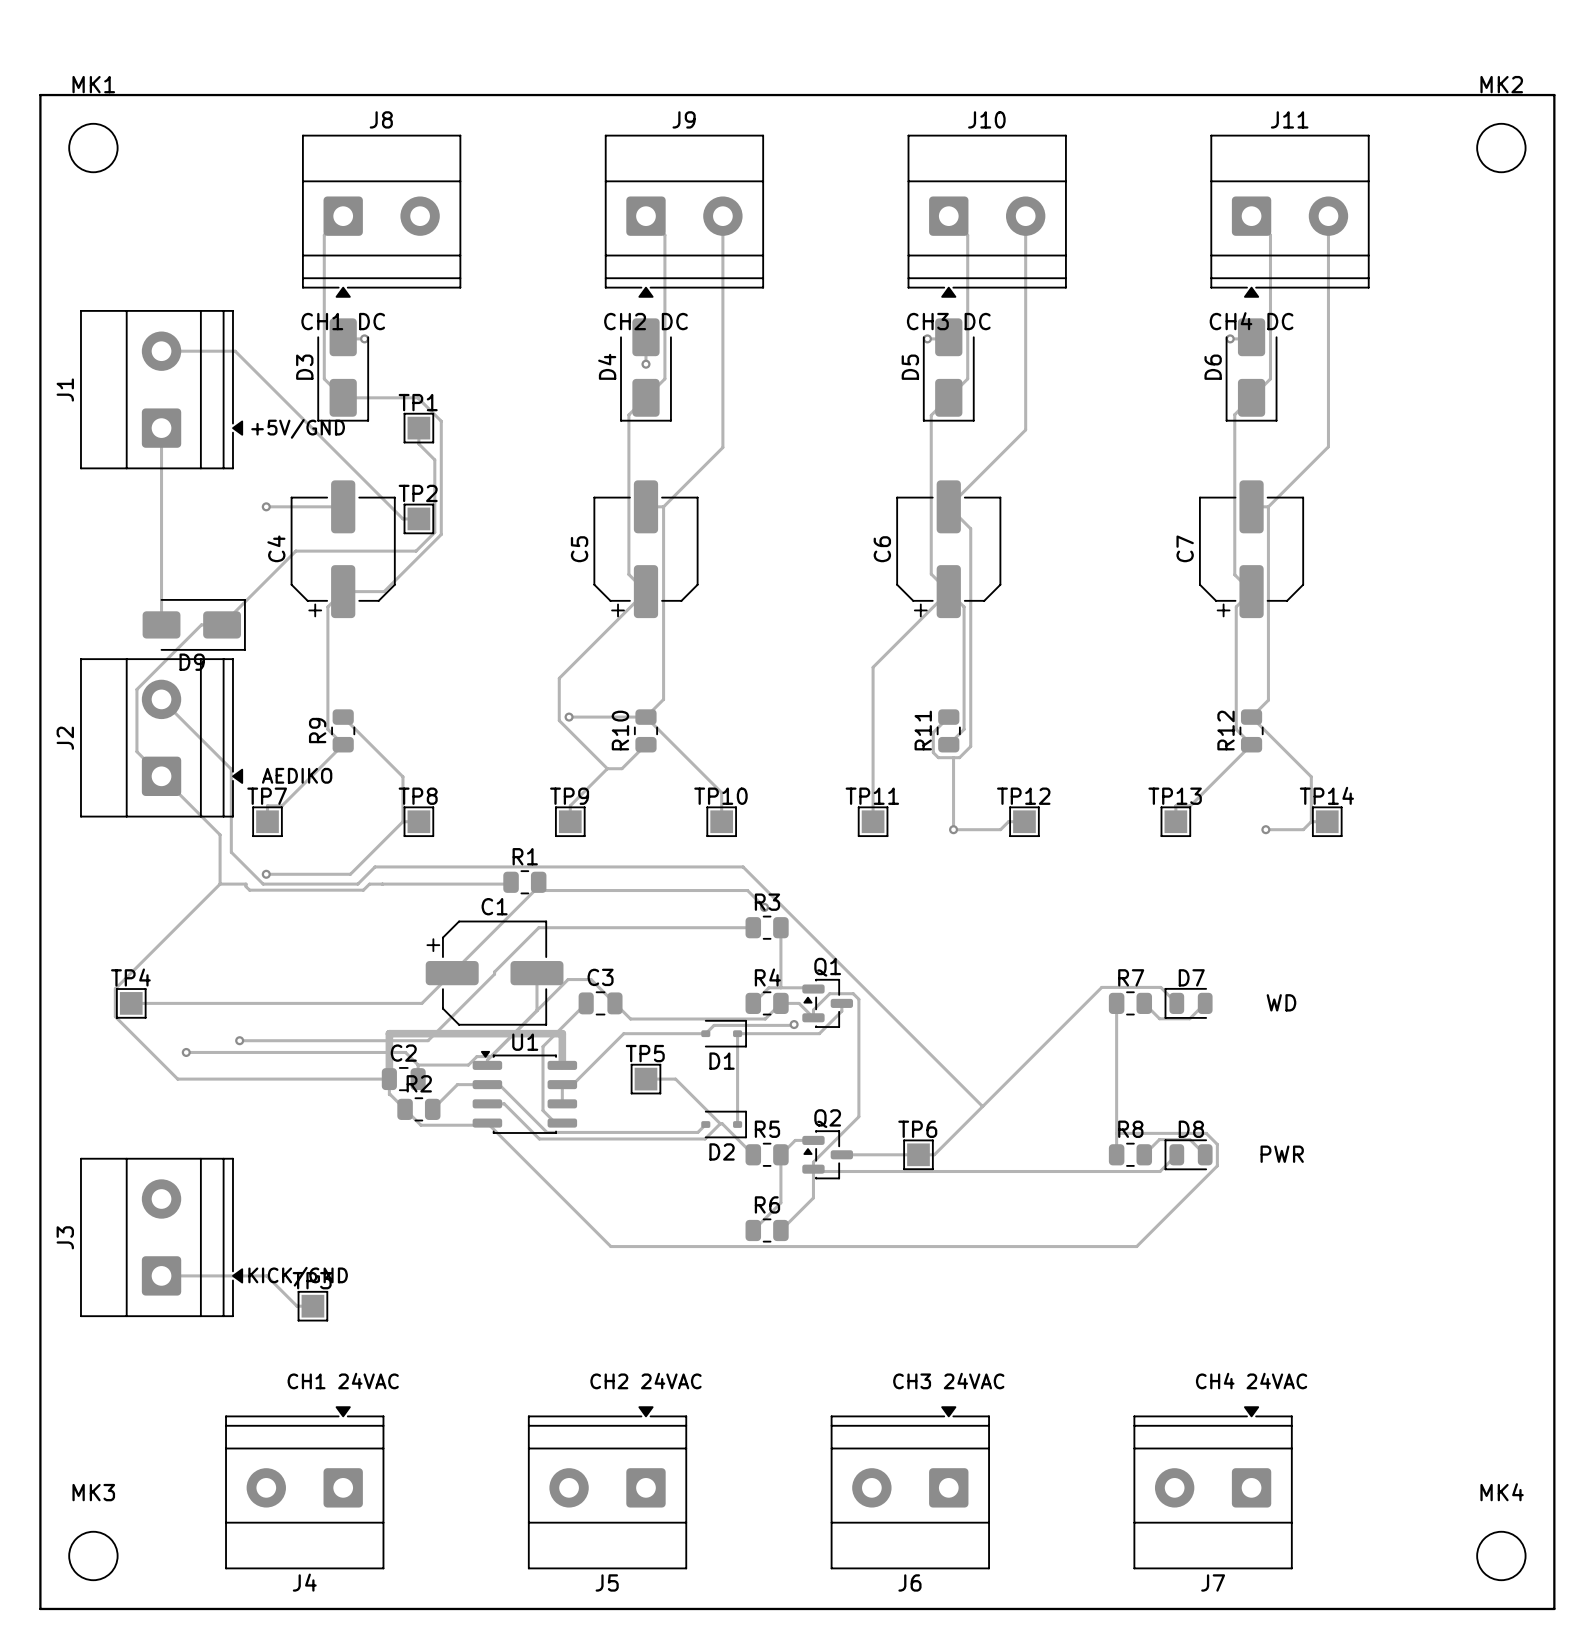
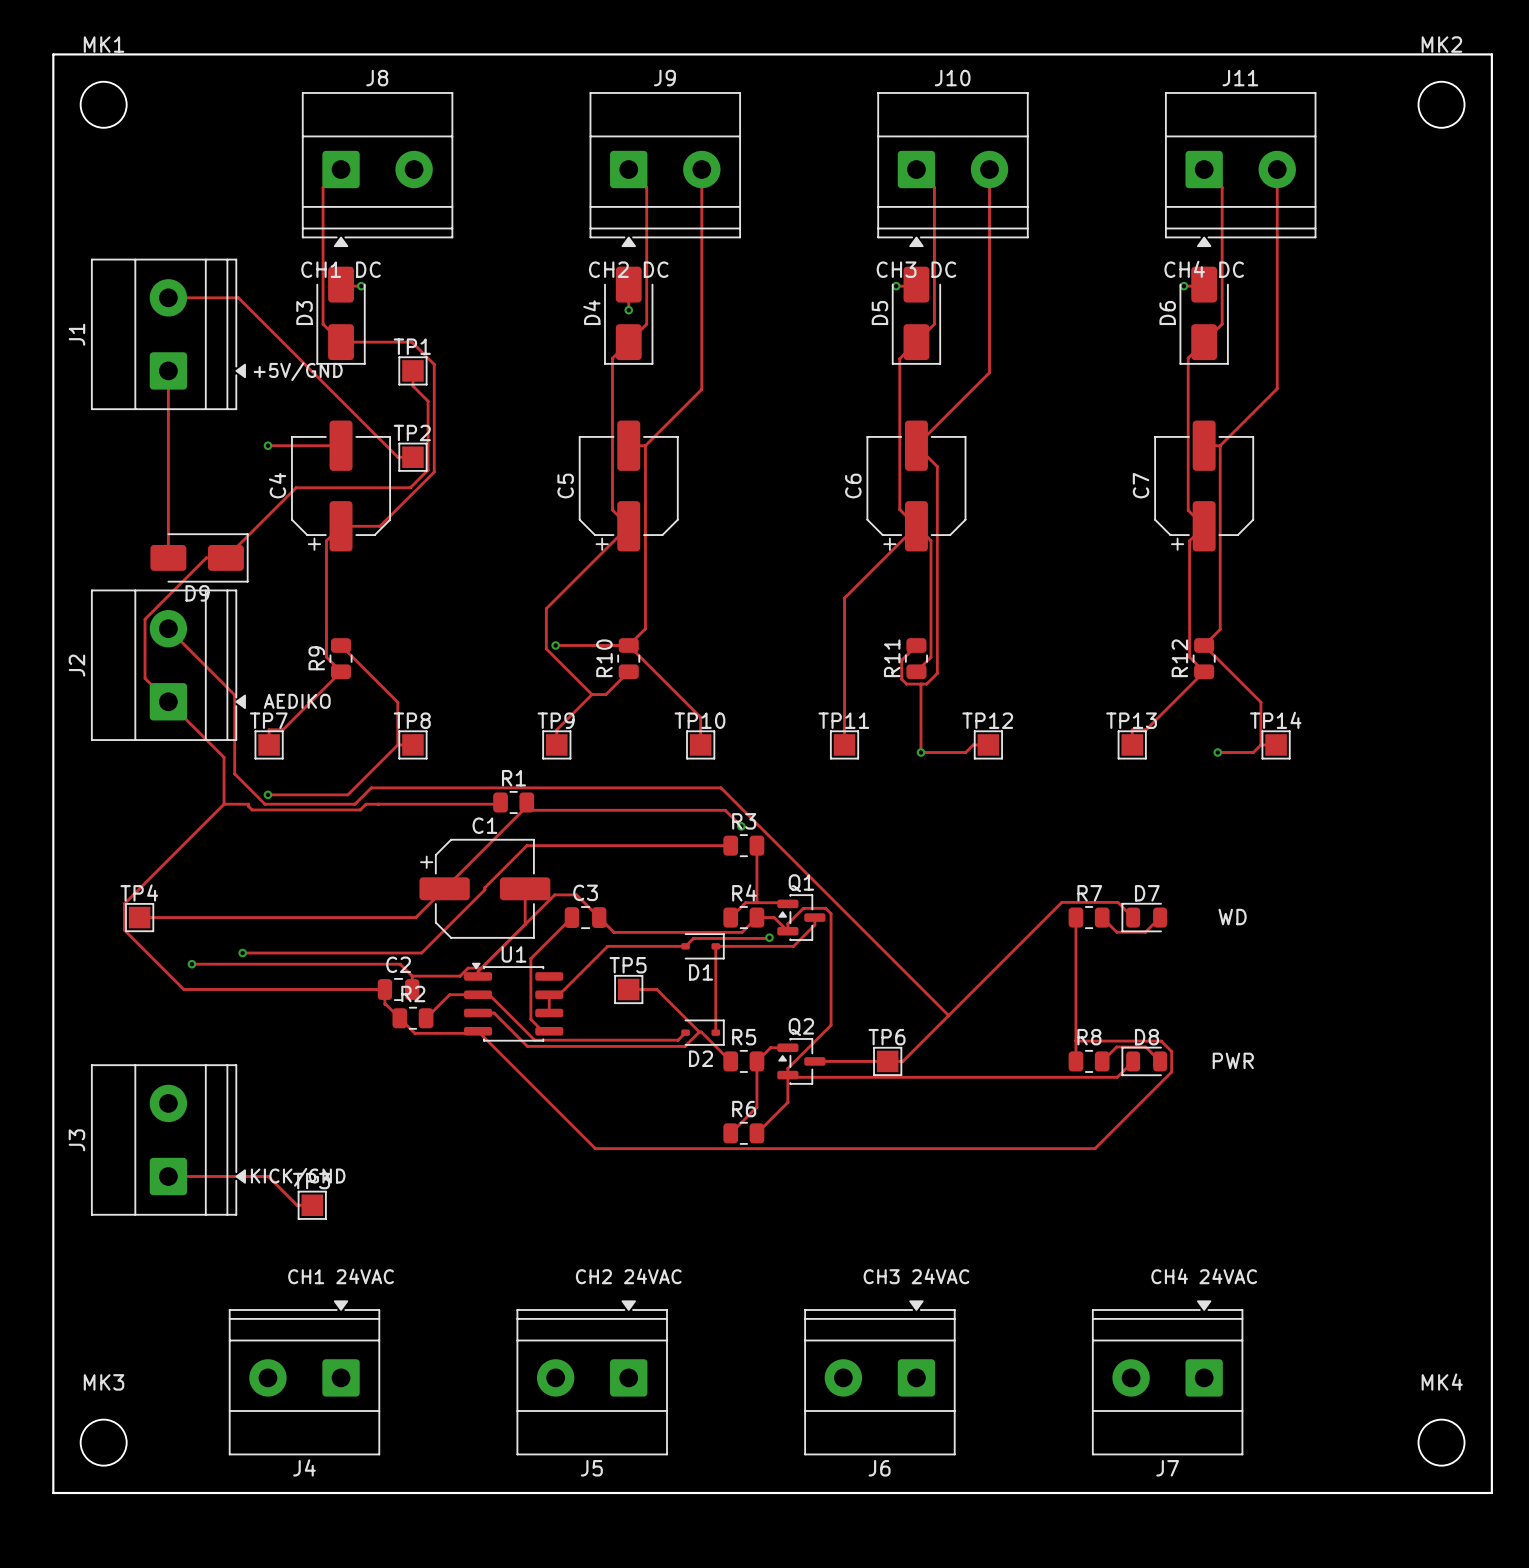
track: (562, 1065) (562, 1033) (389, 1033) (389, 1079) -> none

